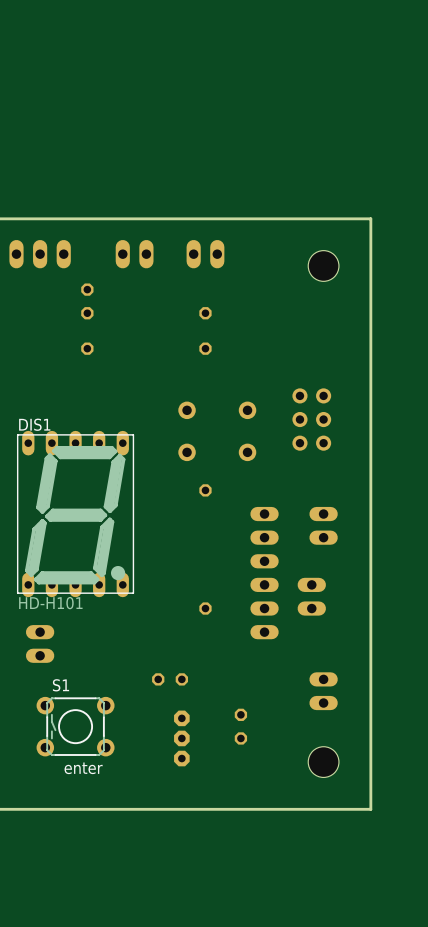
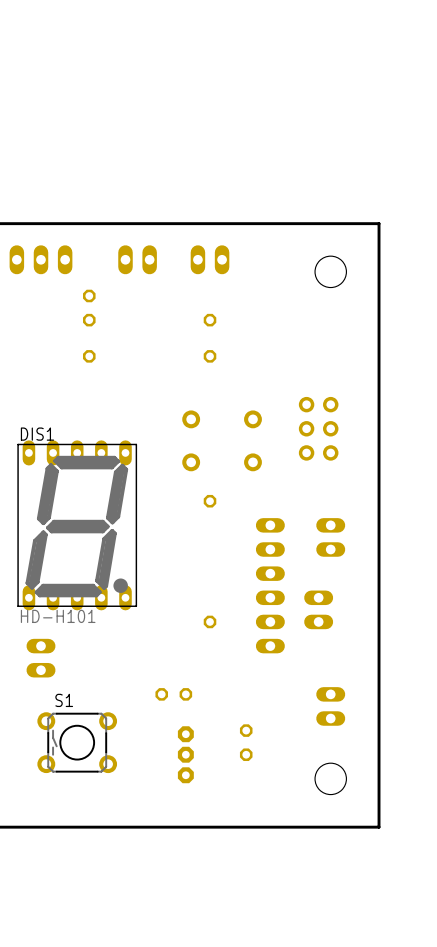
text: enter (83, 768) -> none

